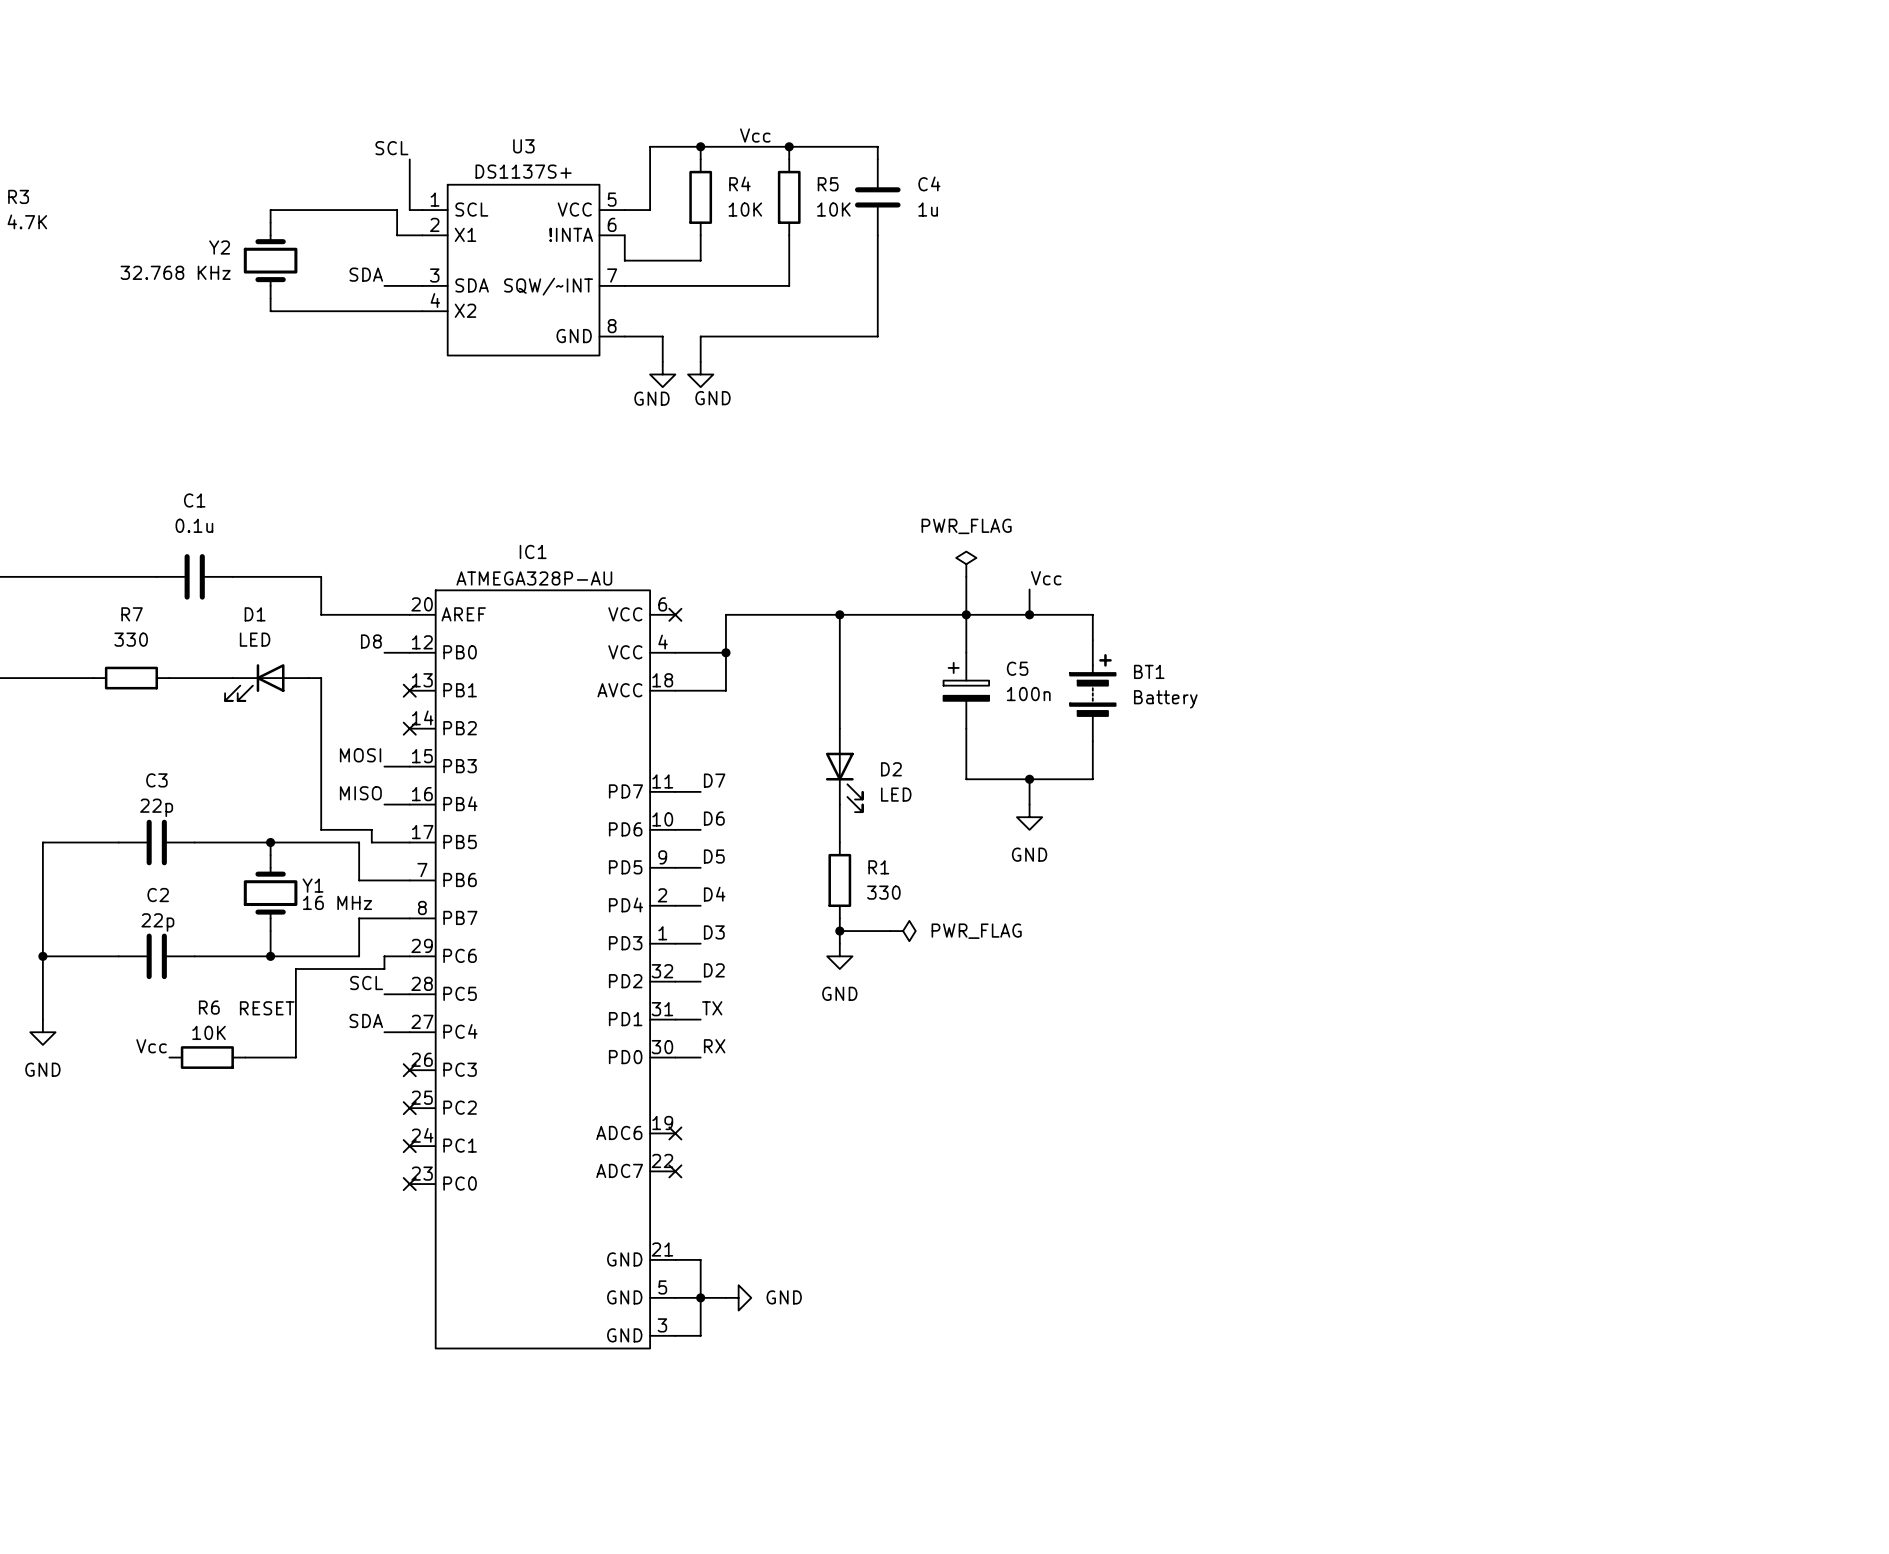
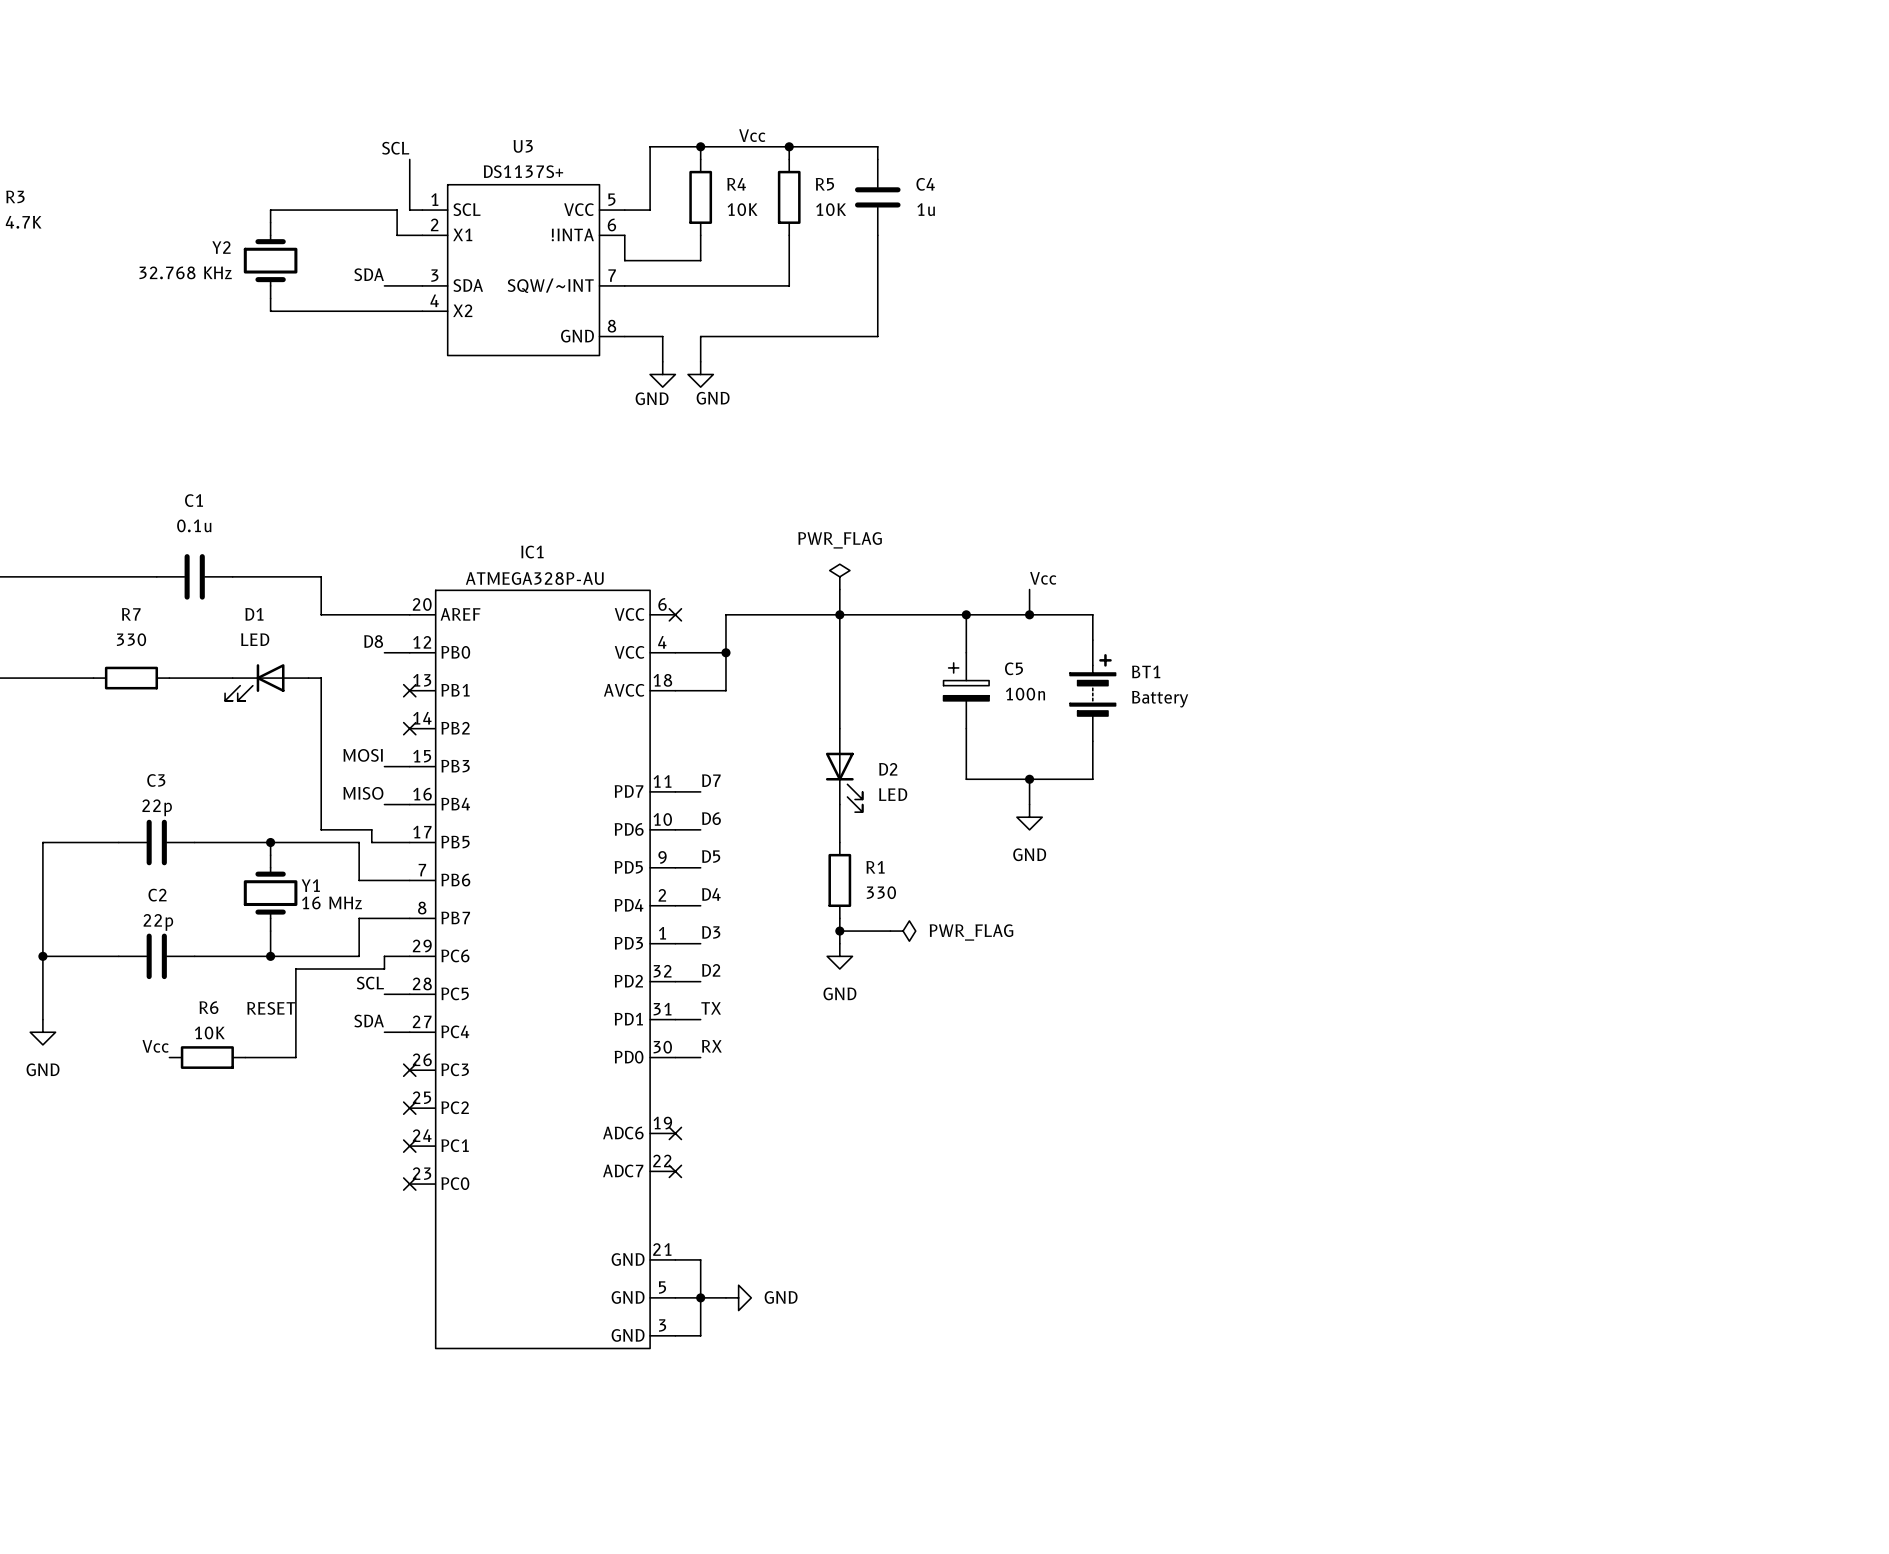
power symbol position: PWR_FLAG (966, 564) -> PWR_FLAG (839, 576)
wire: (966, 576) (966, 614) -> none
wire: none -> (839, 589) (839, 614)

